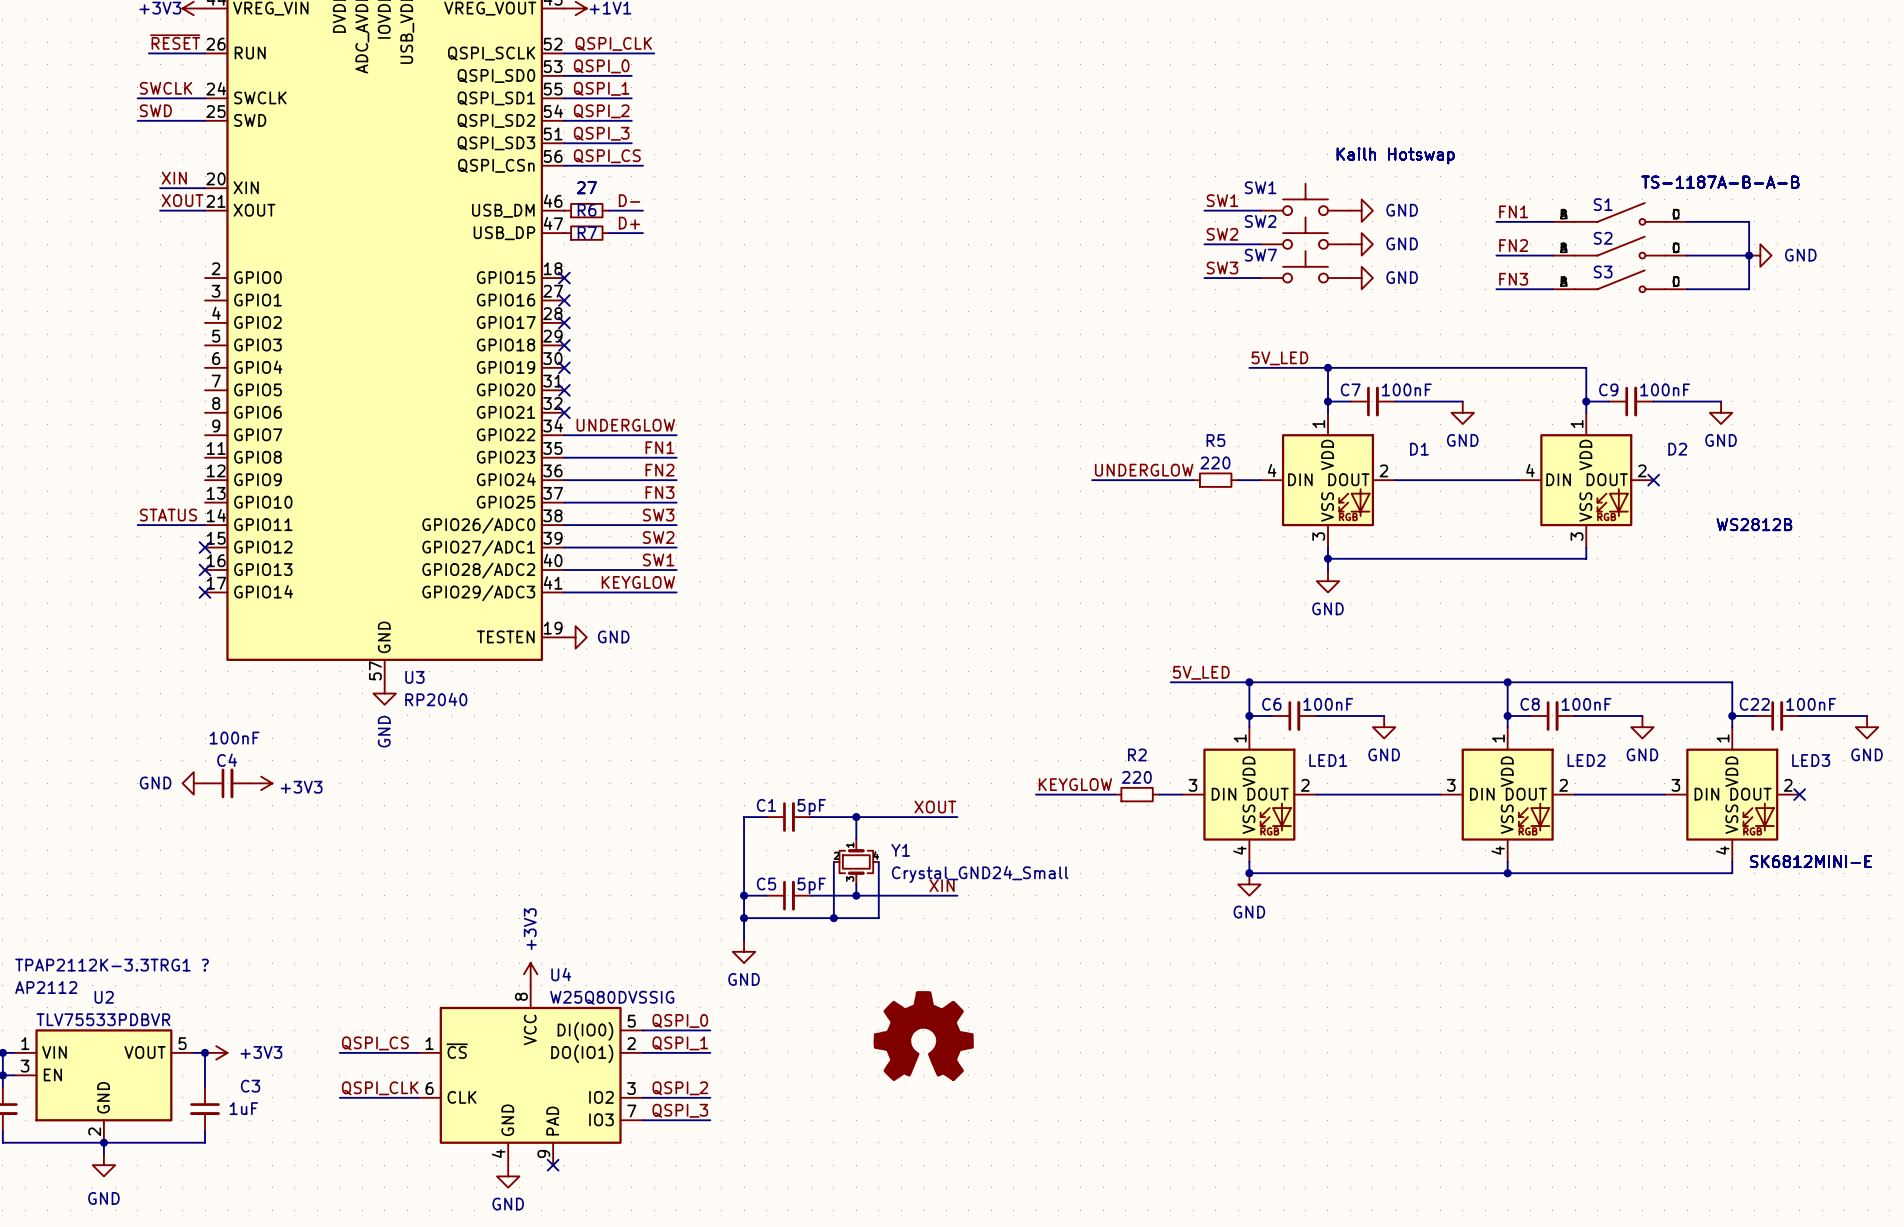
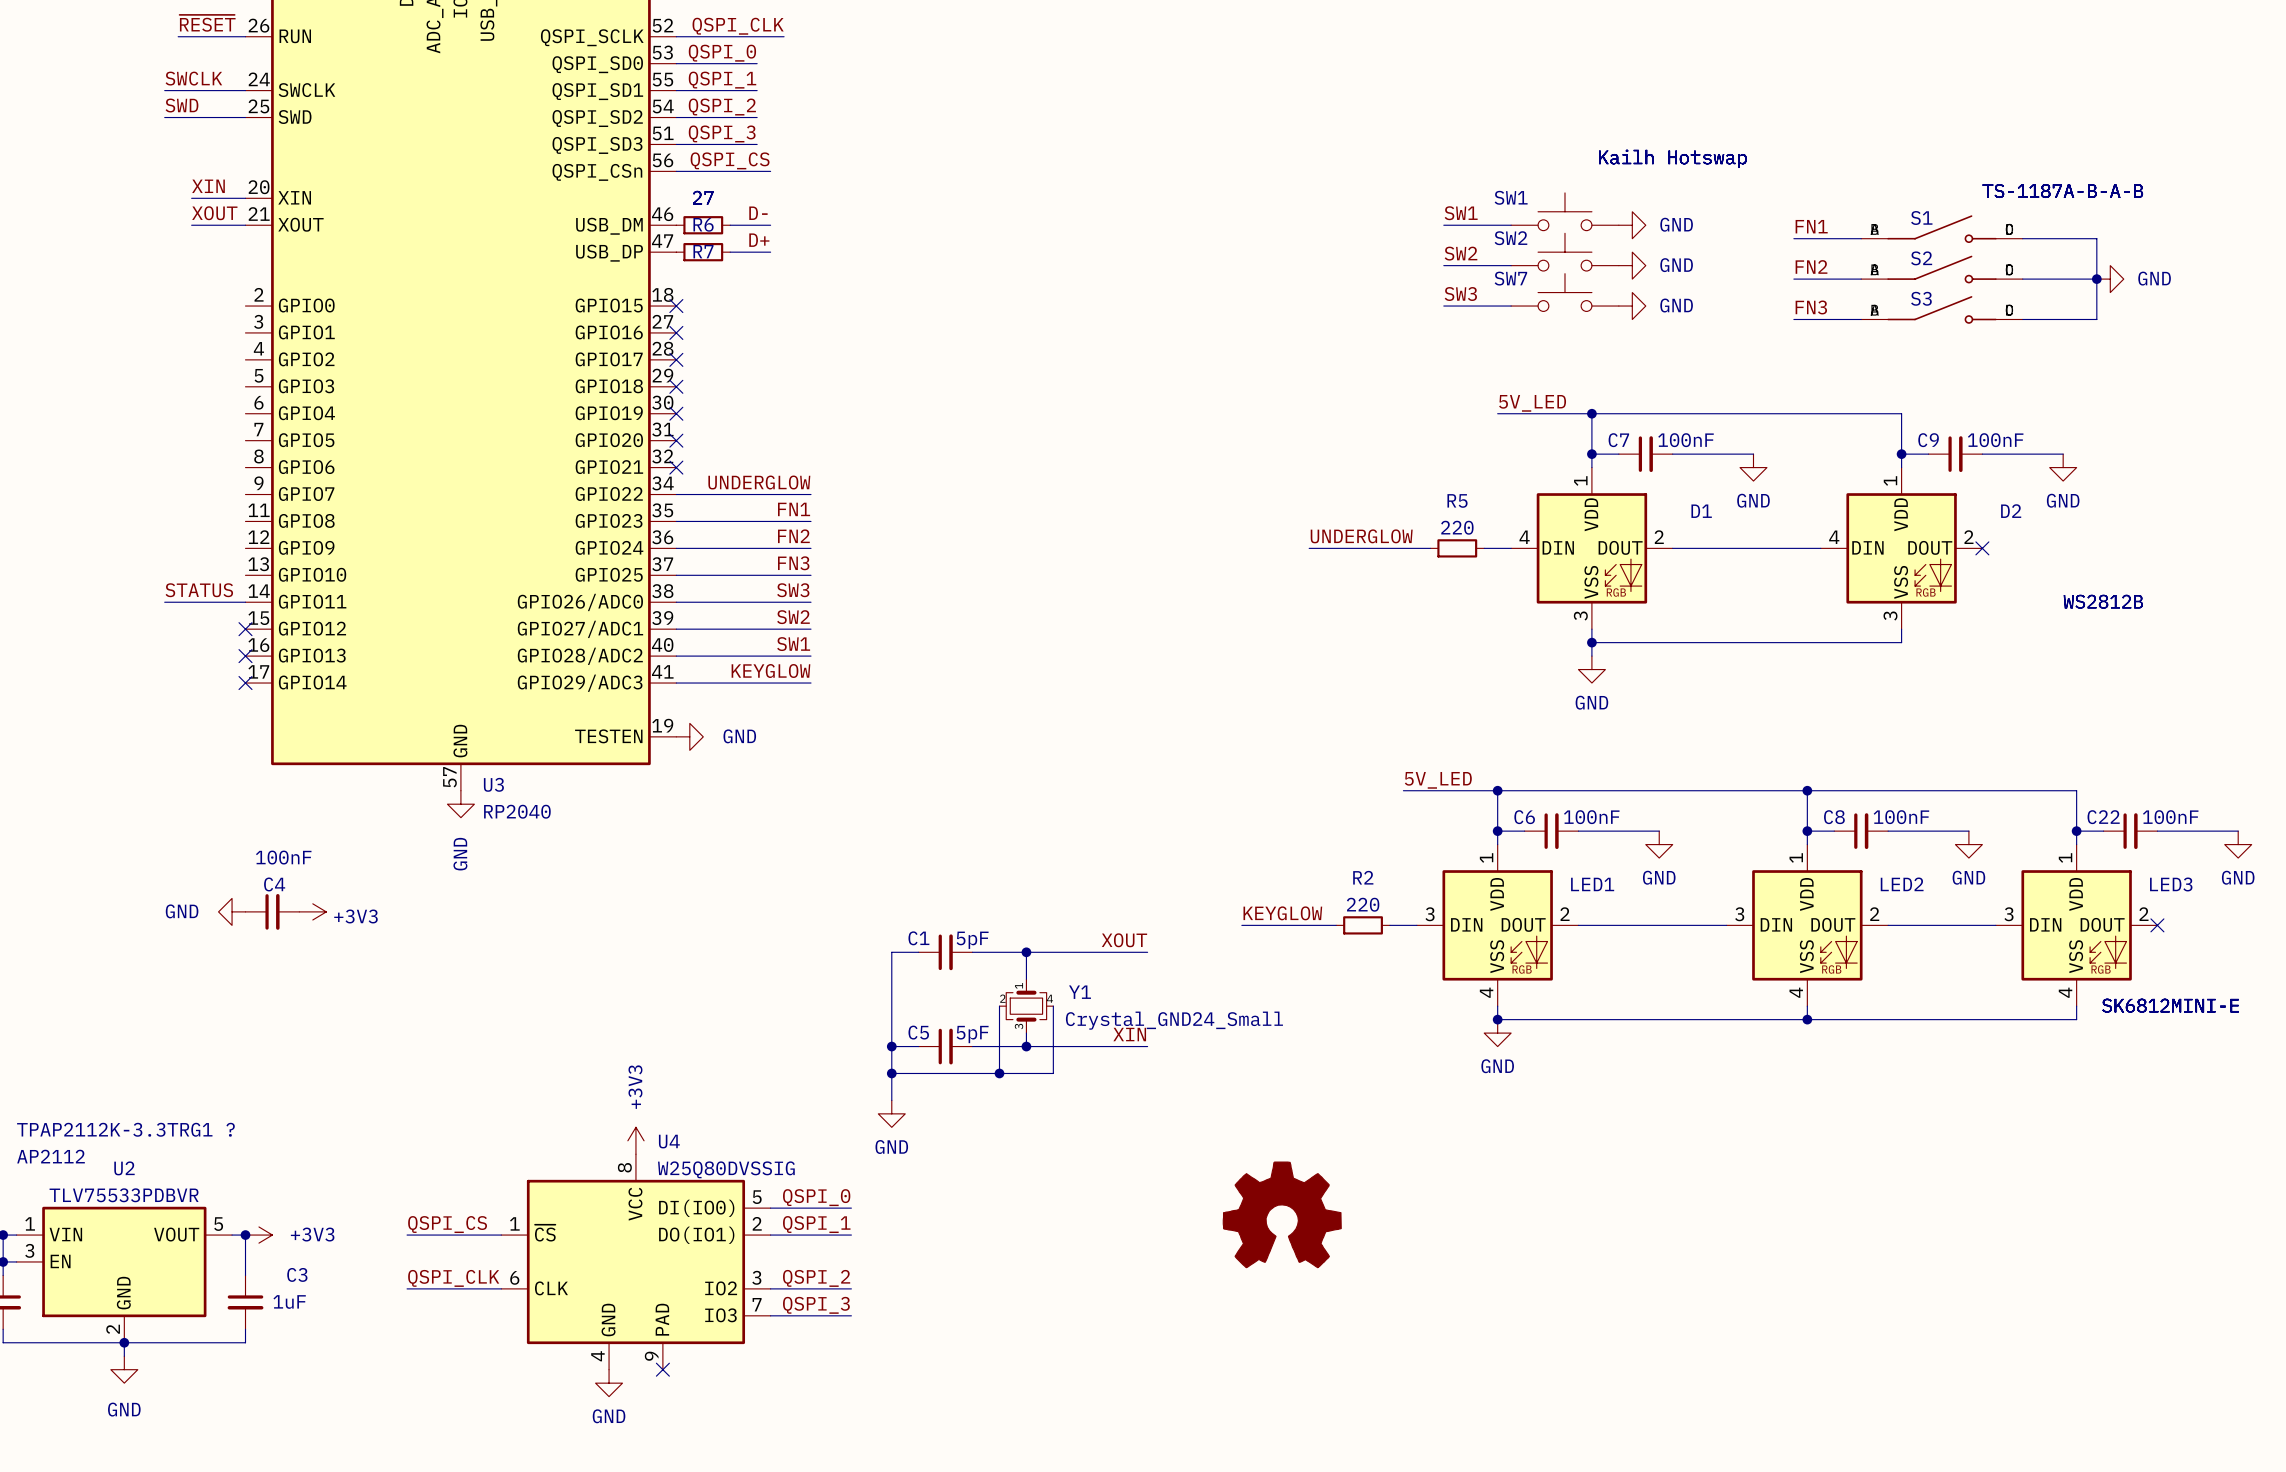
power symbol position: (923, 1036) -> (1282, 1214)

